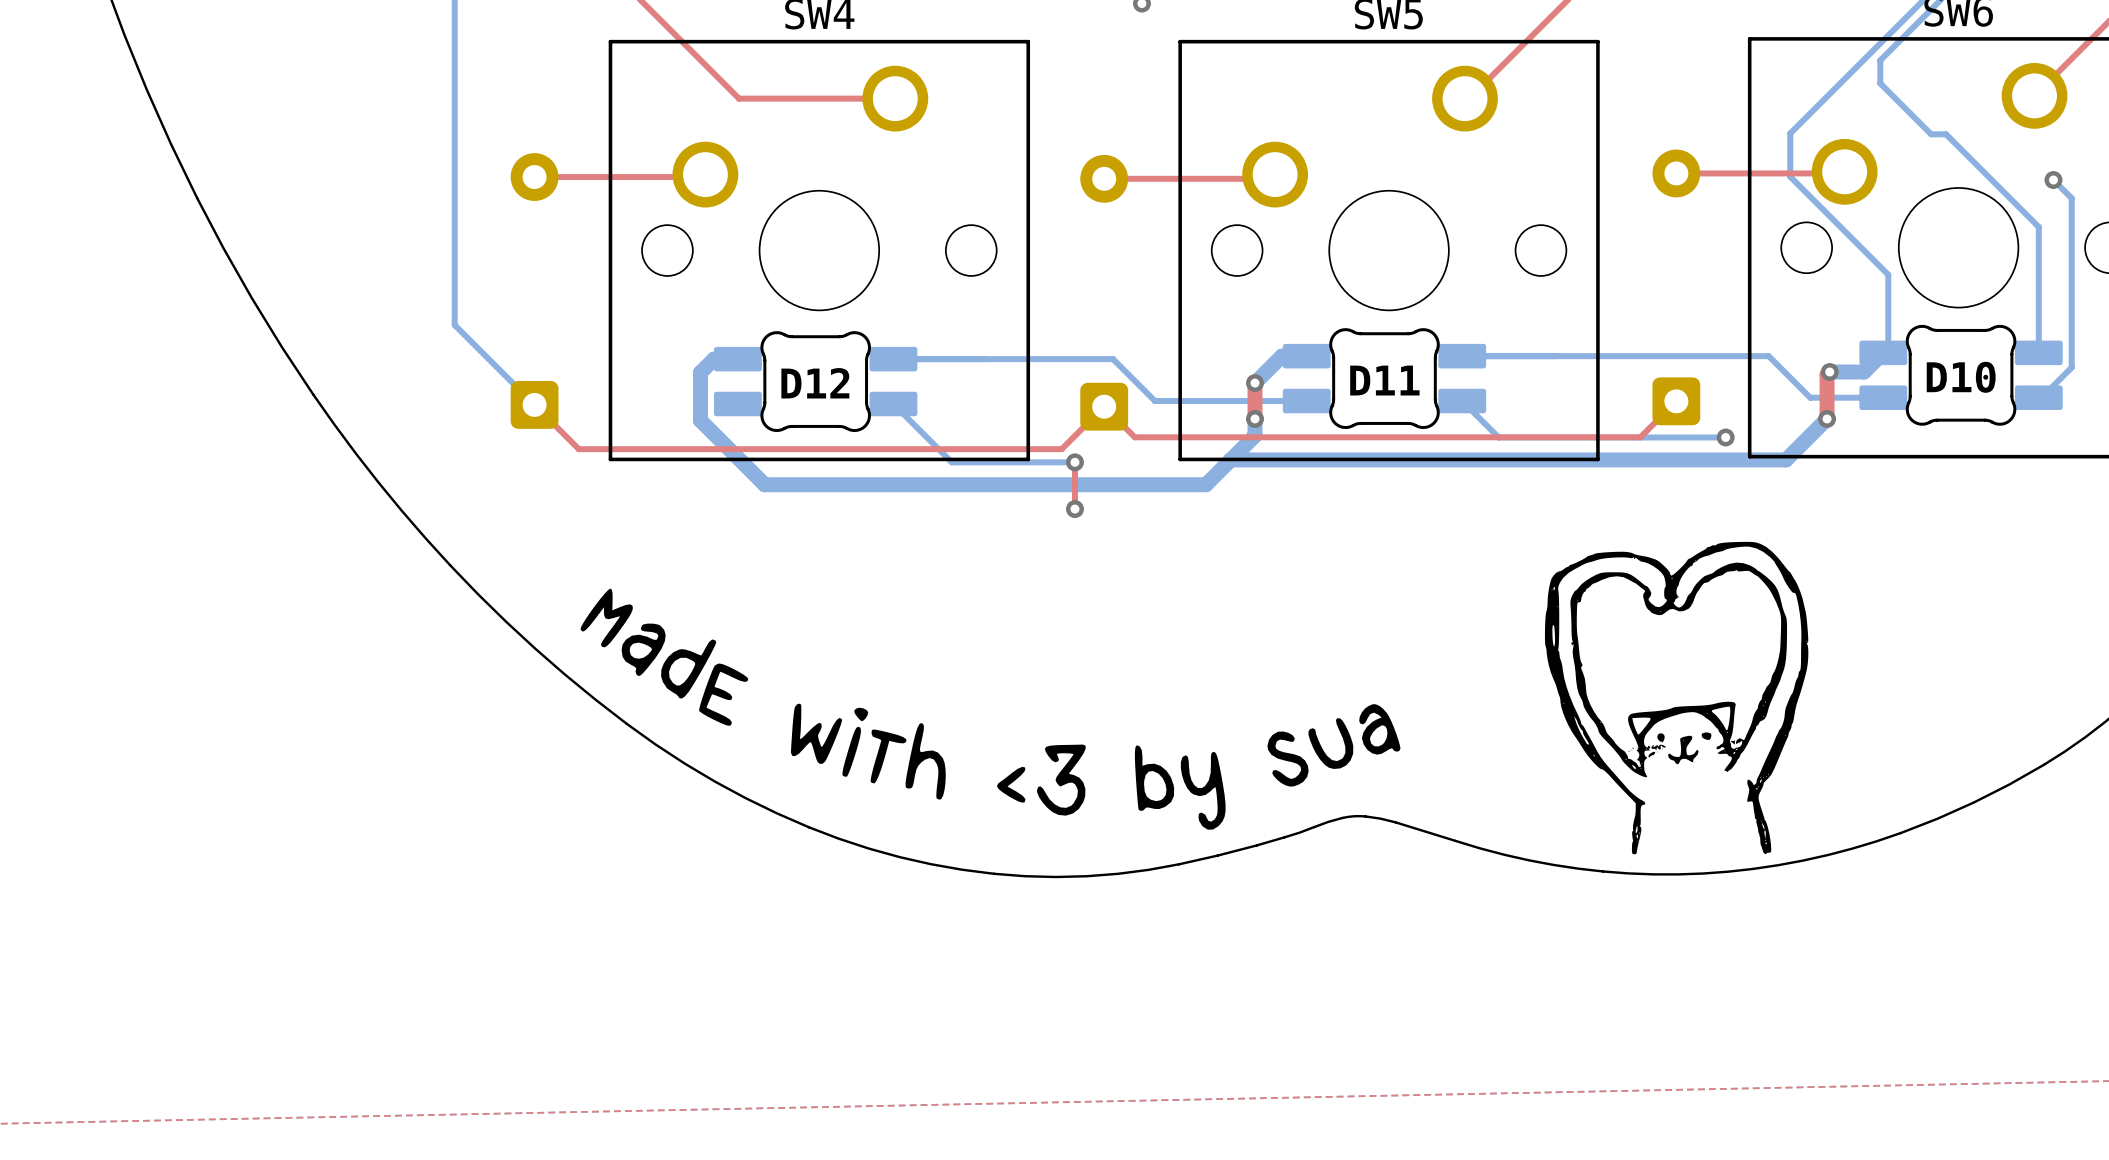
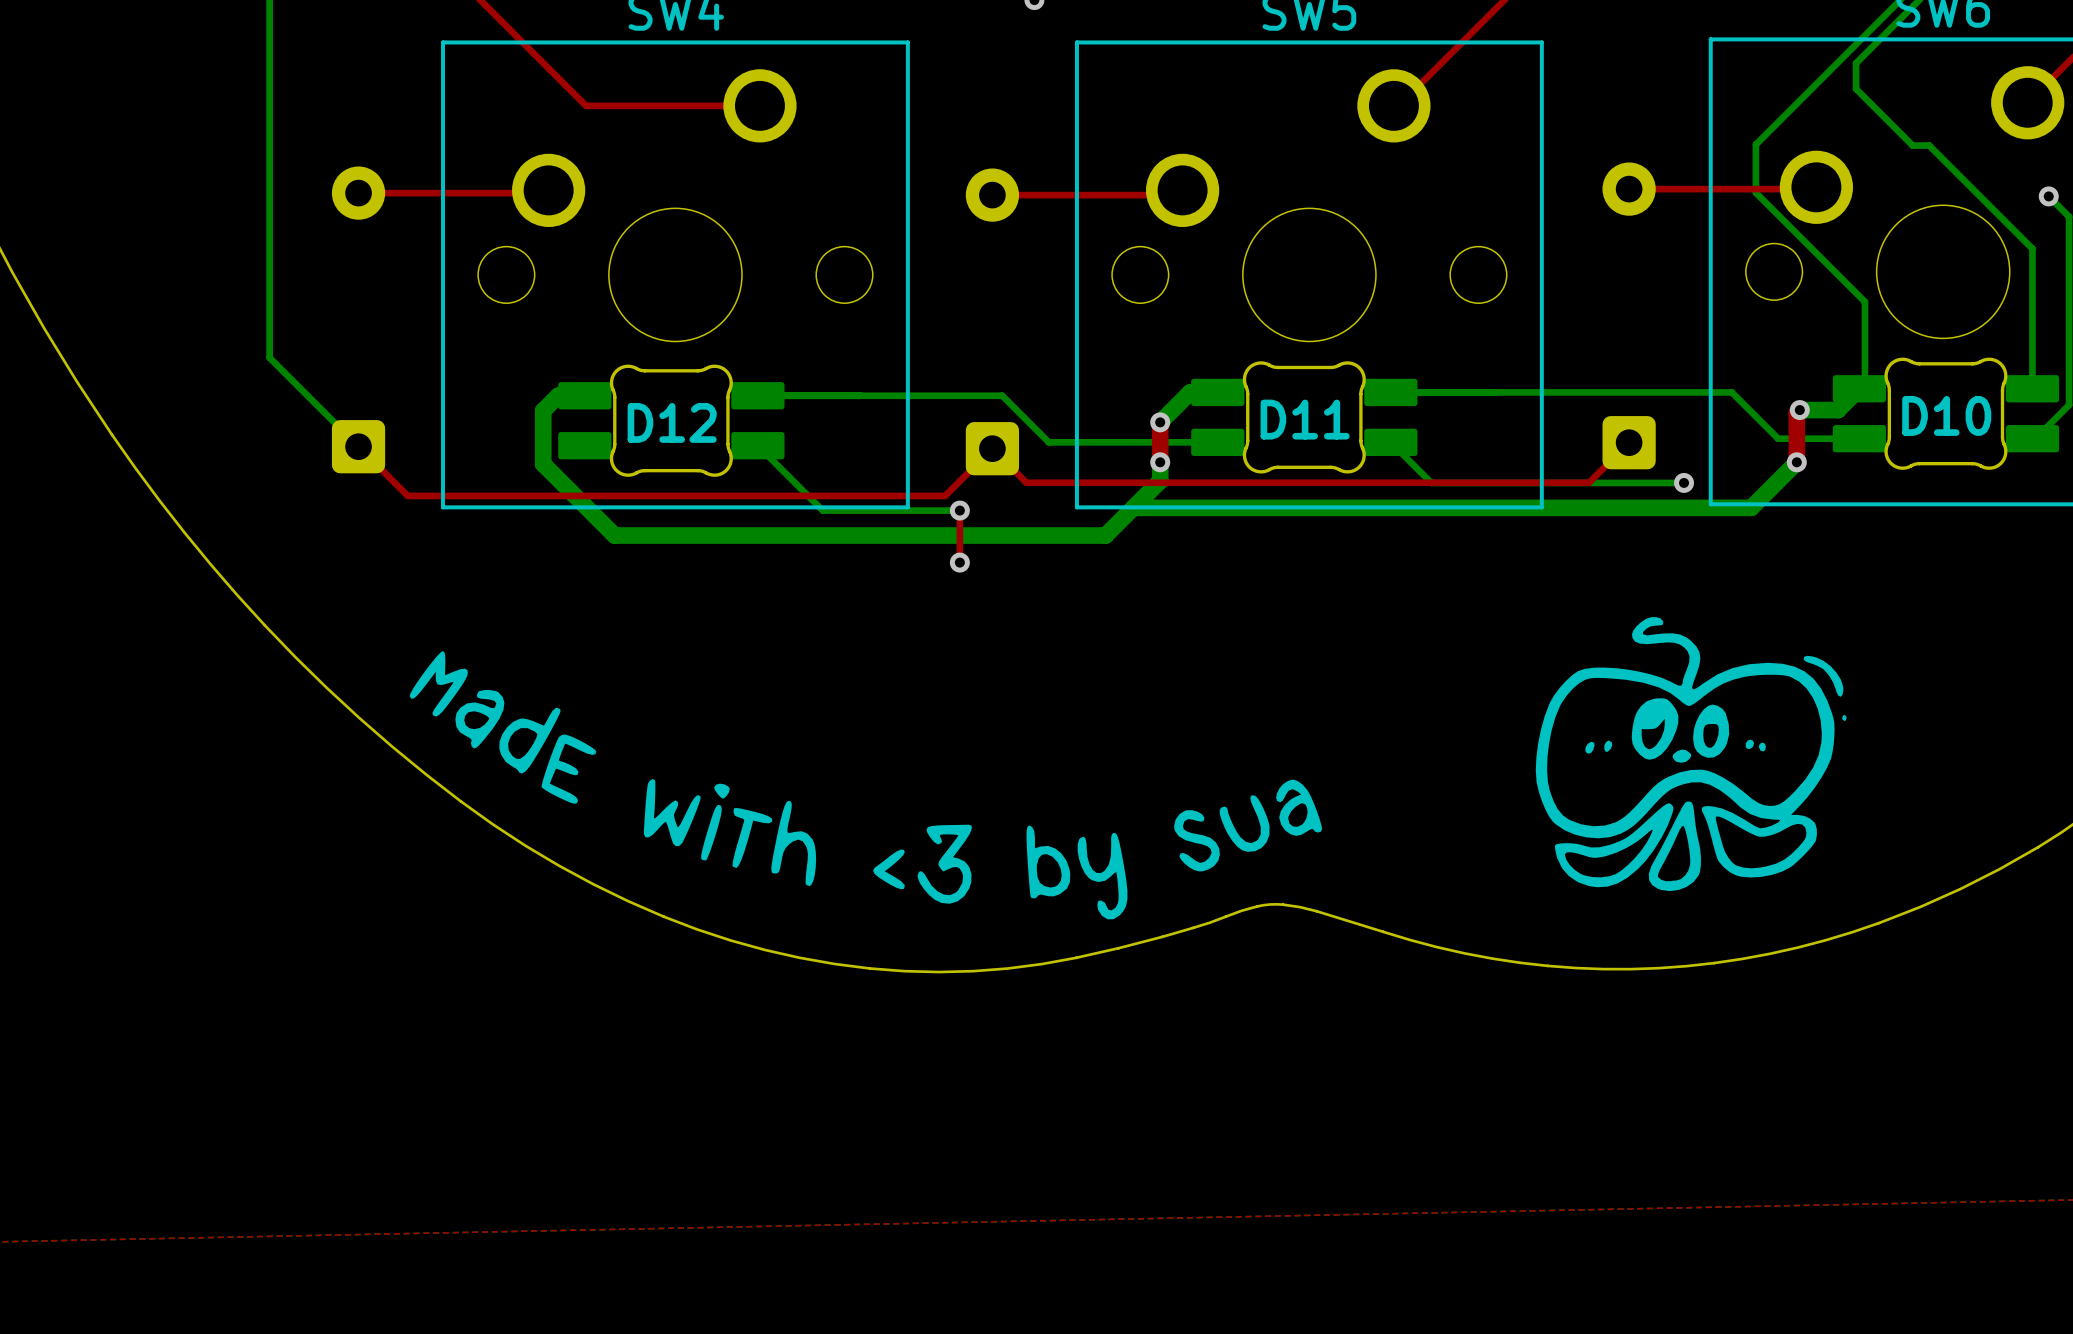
drawing: [1544, 541, 1809, 855] -> none
drawing: none -> [1535, 617, 1847, 892]

